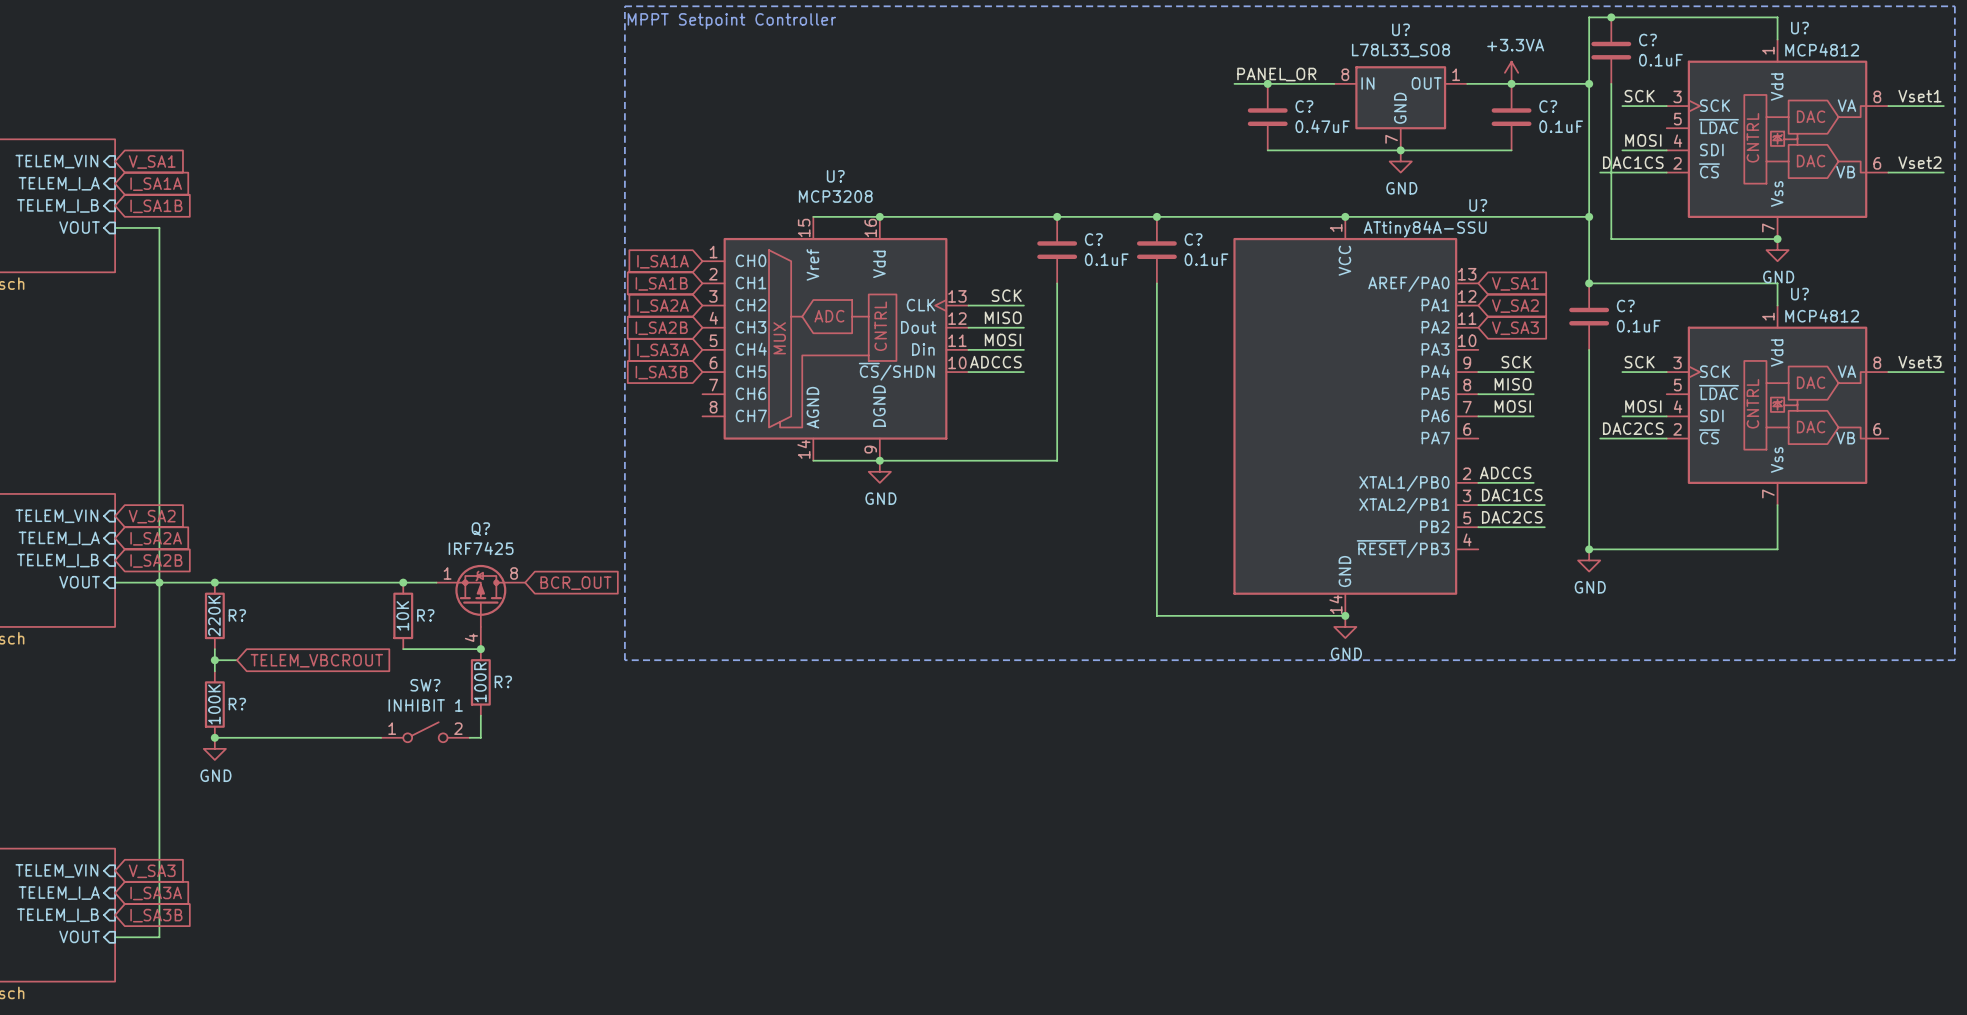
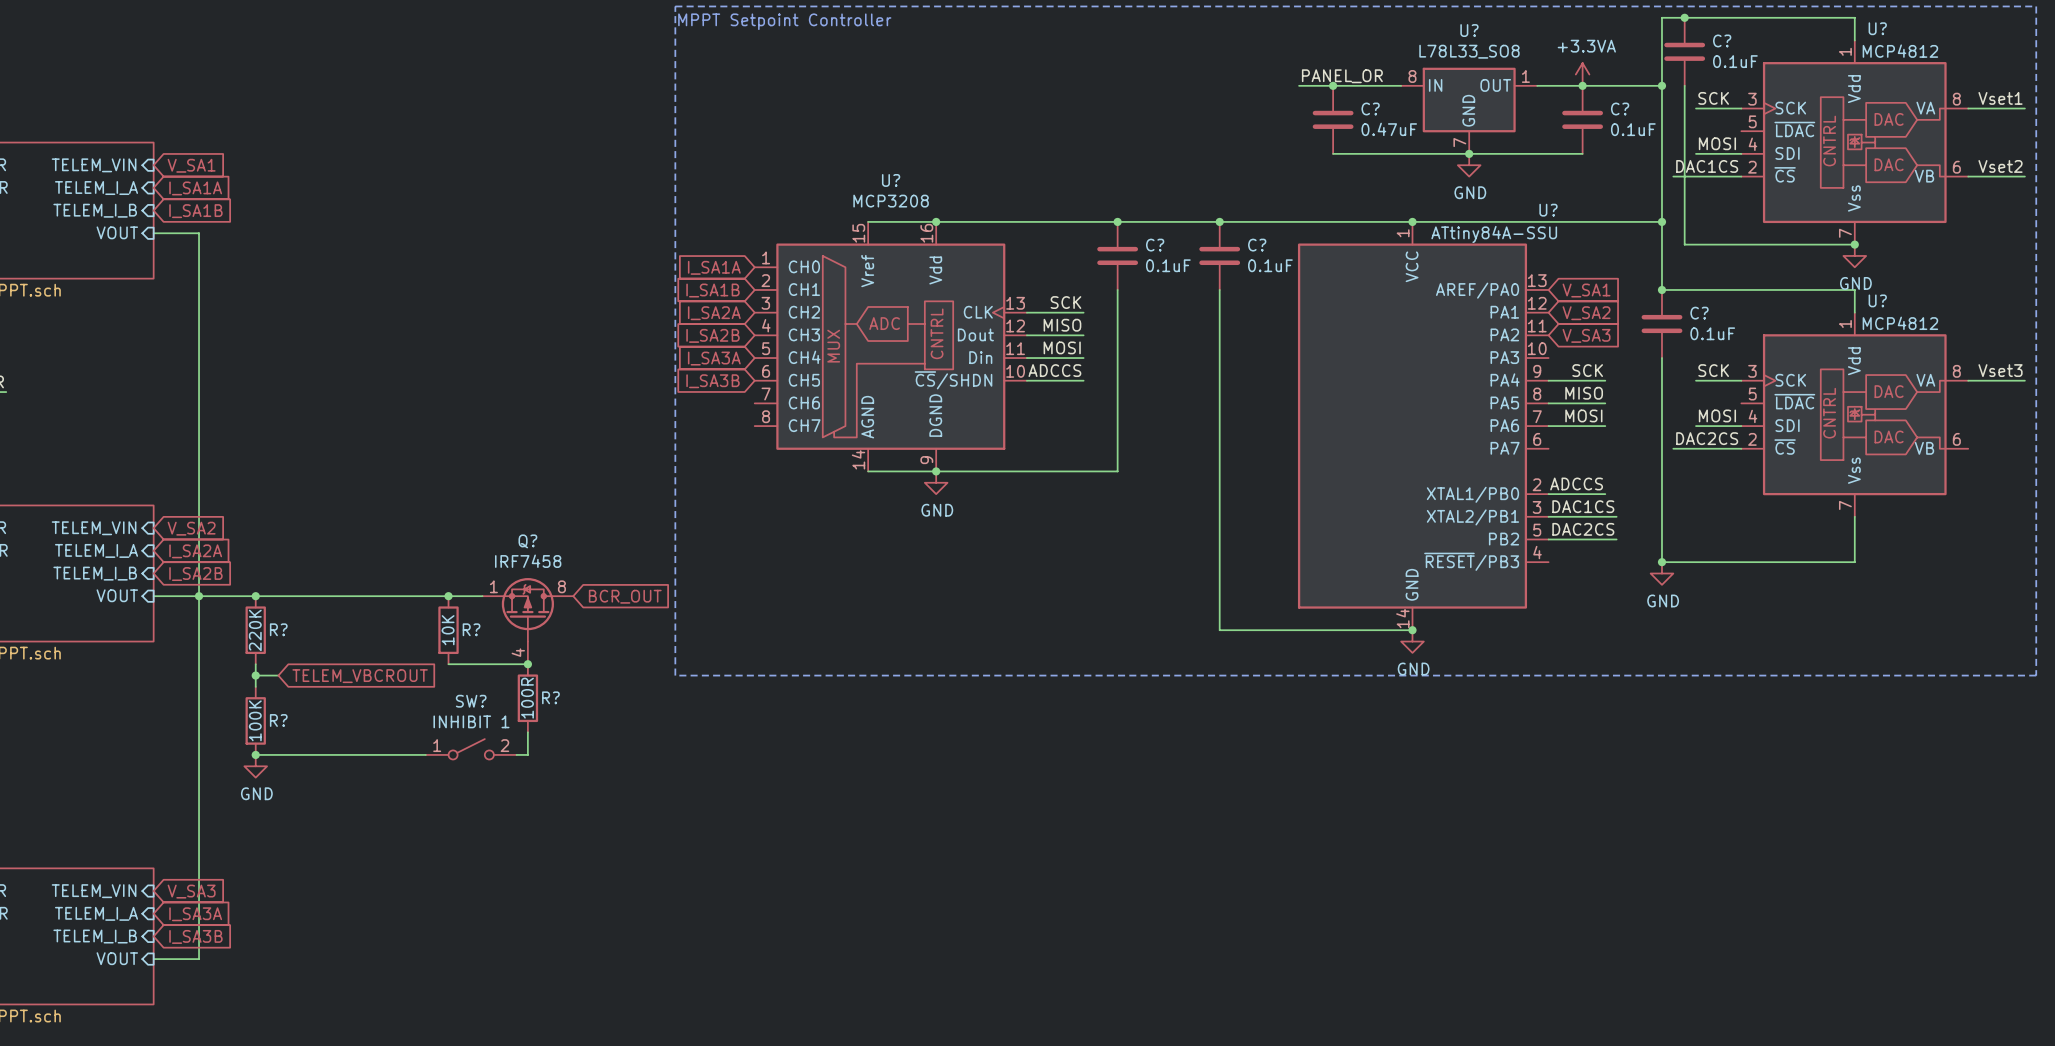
Q? value: IRF7425 (481, 548) -> IRF7458 (528, 561)

